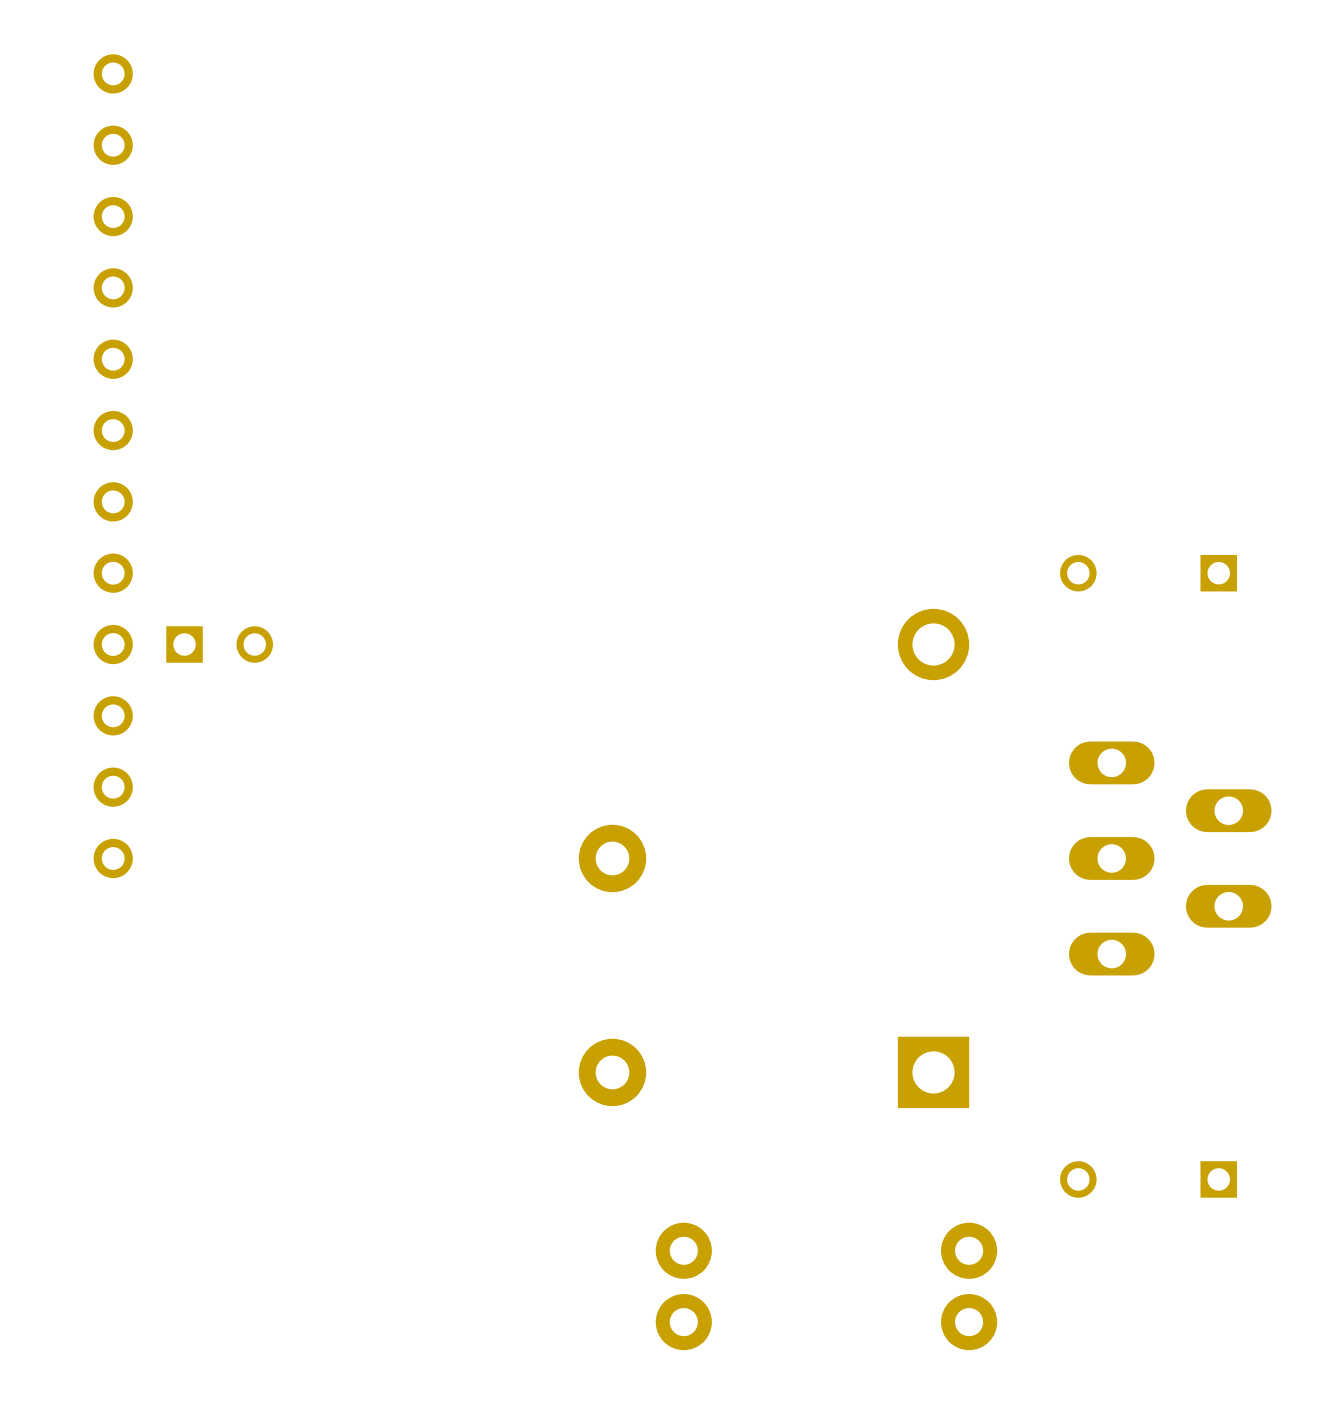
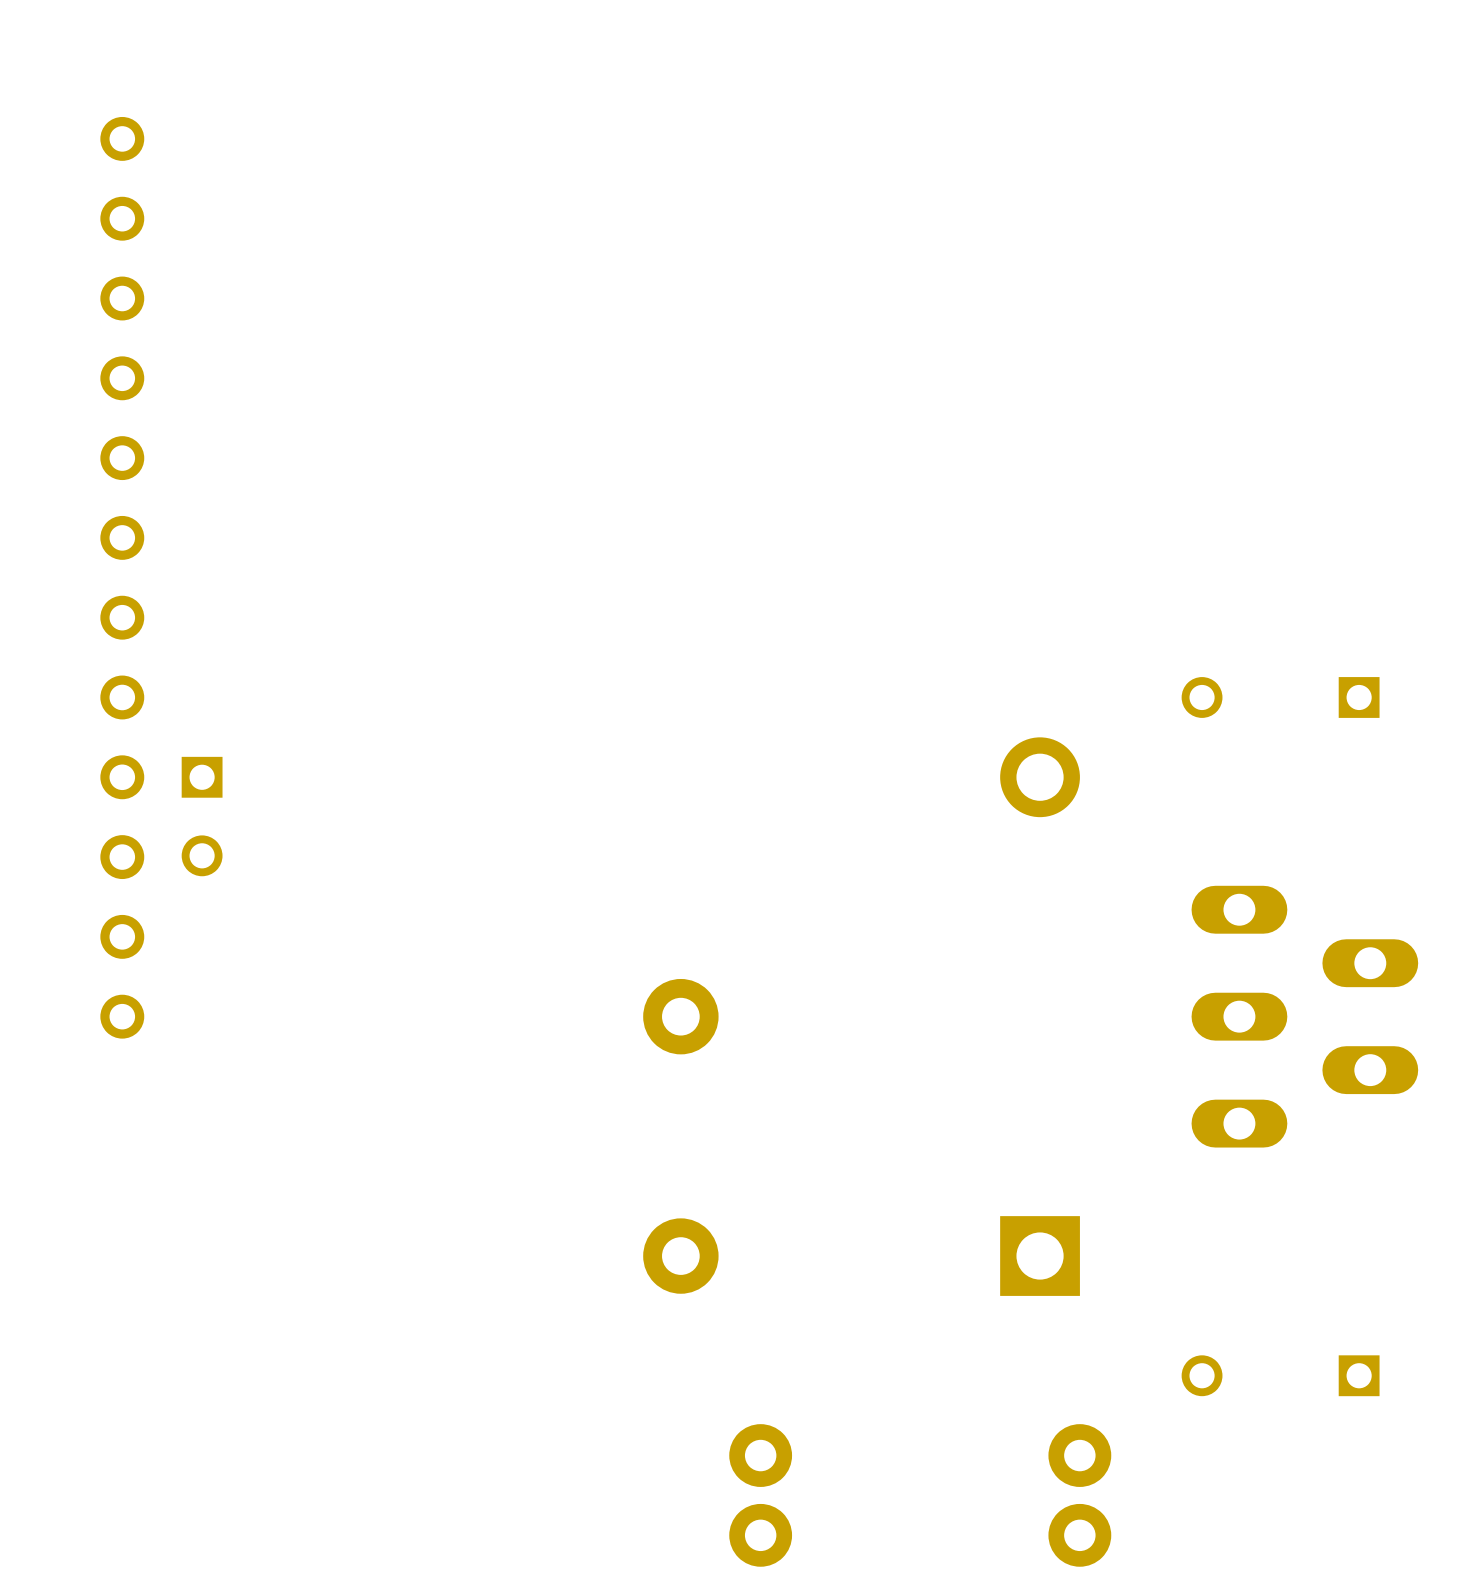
part rotation: 0° (219, 644) -> 90° clockwise (202, 816)

